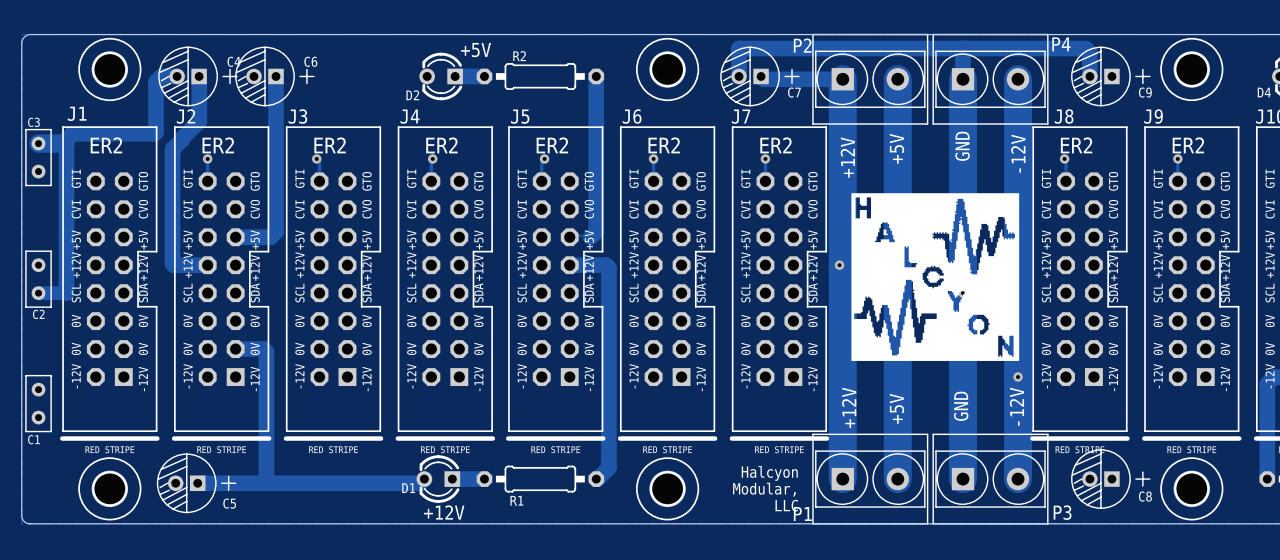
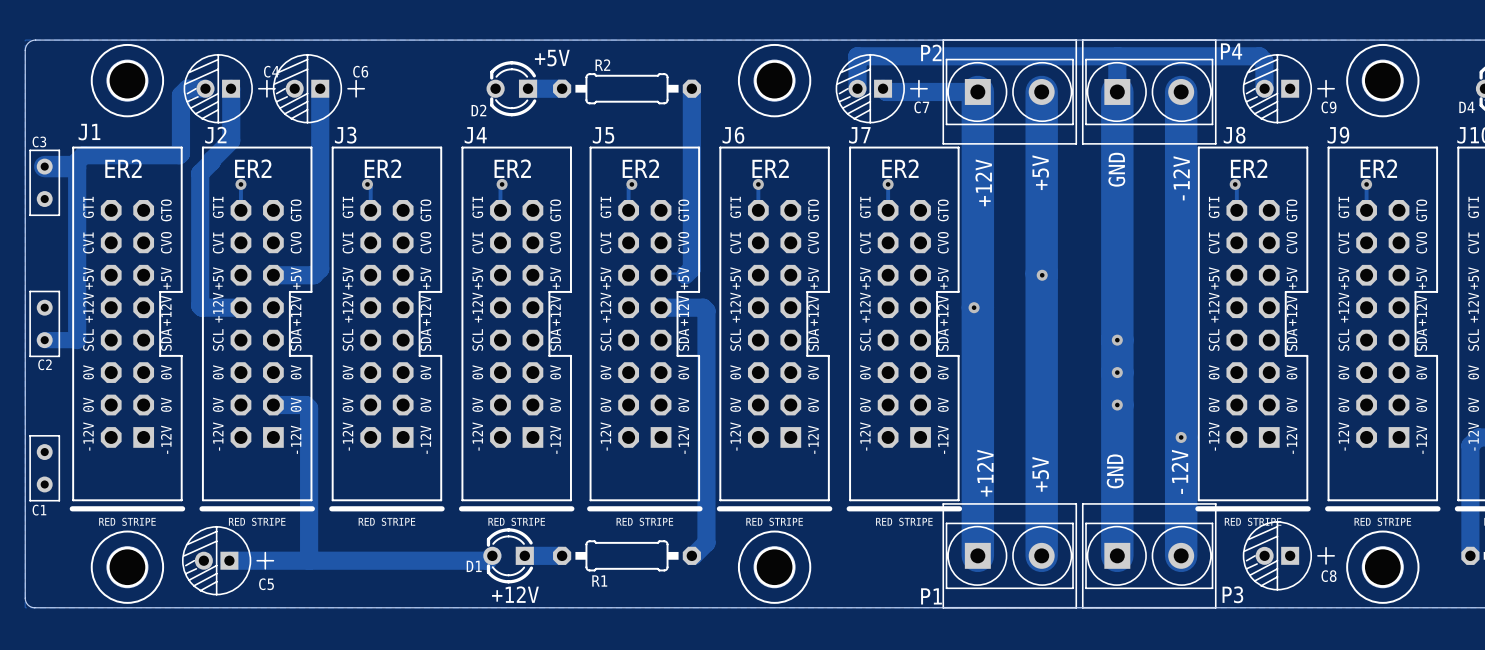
drawing: [851, 193, 1020, 361] -> none
text: Halcyon (769, 473) -> none
text: Modular, (764, 489) -> none
text: LLC (786, 505) -> none

